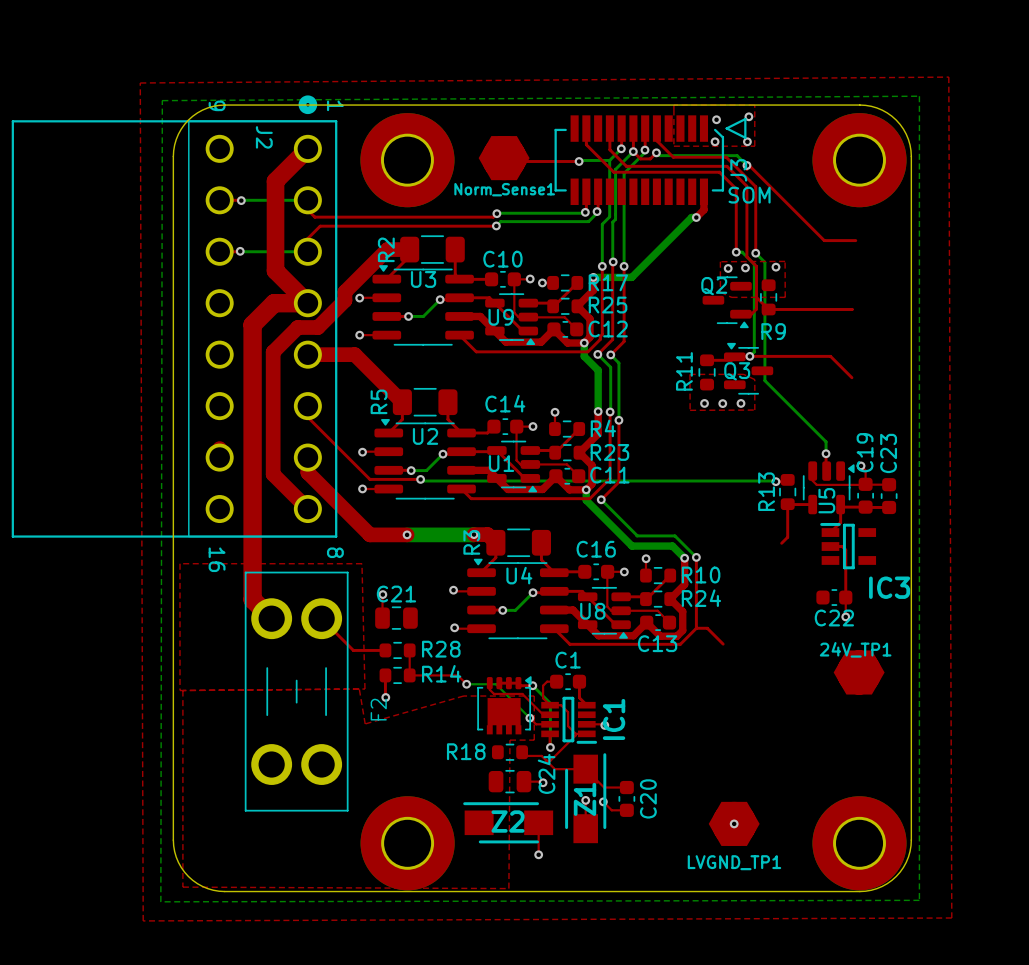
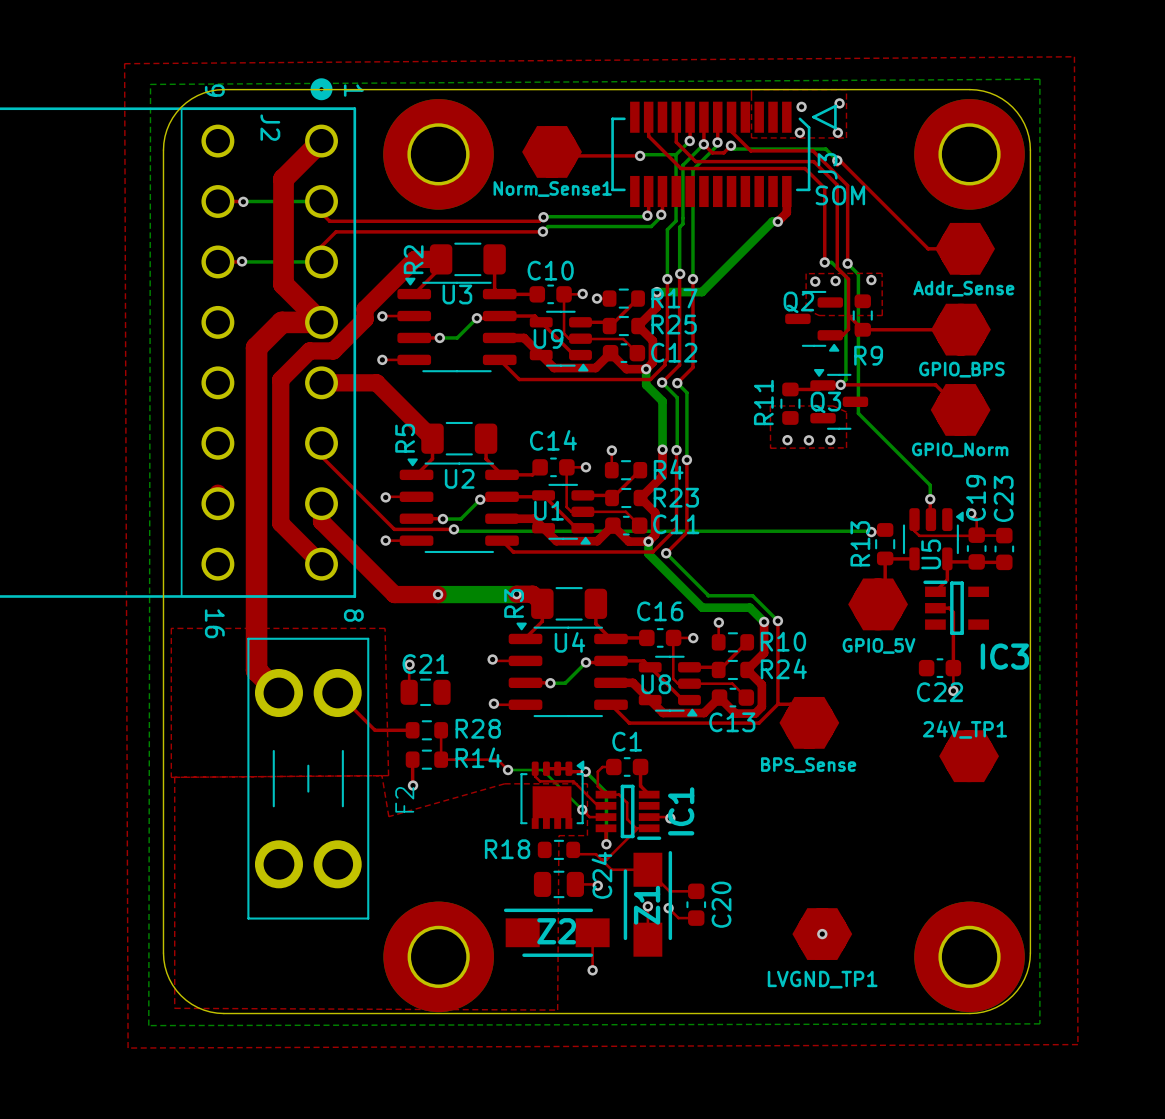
Addr_Sense: none -> (965, 248)
GPIO_BPS: none -> (960, 329)
GPIO_Norm: none -> (960, 409)
GPIO_5V: none -> (878, 604)
BPS_Sense: none -> (809, 722)

